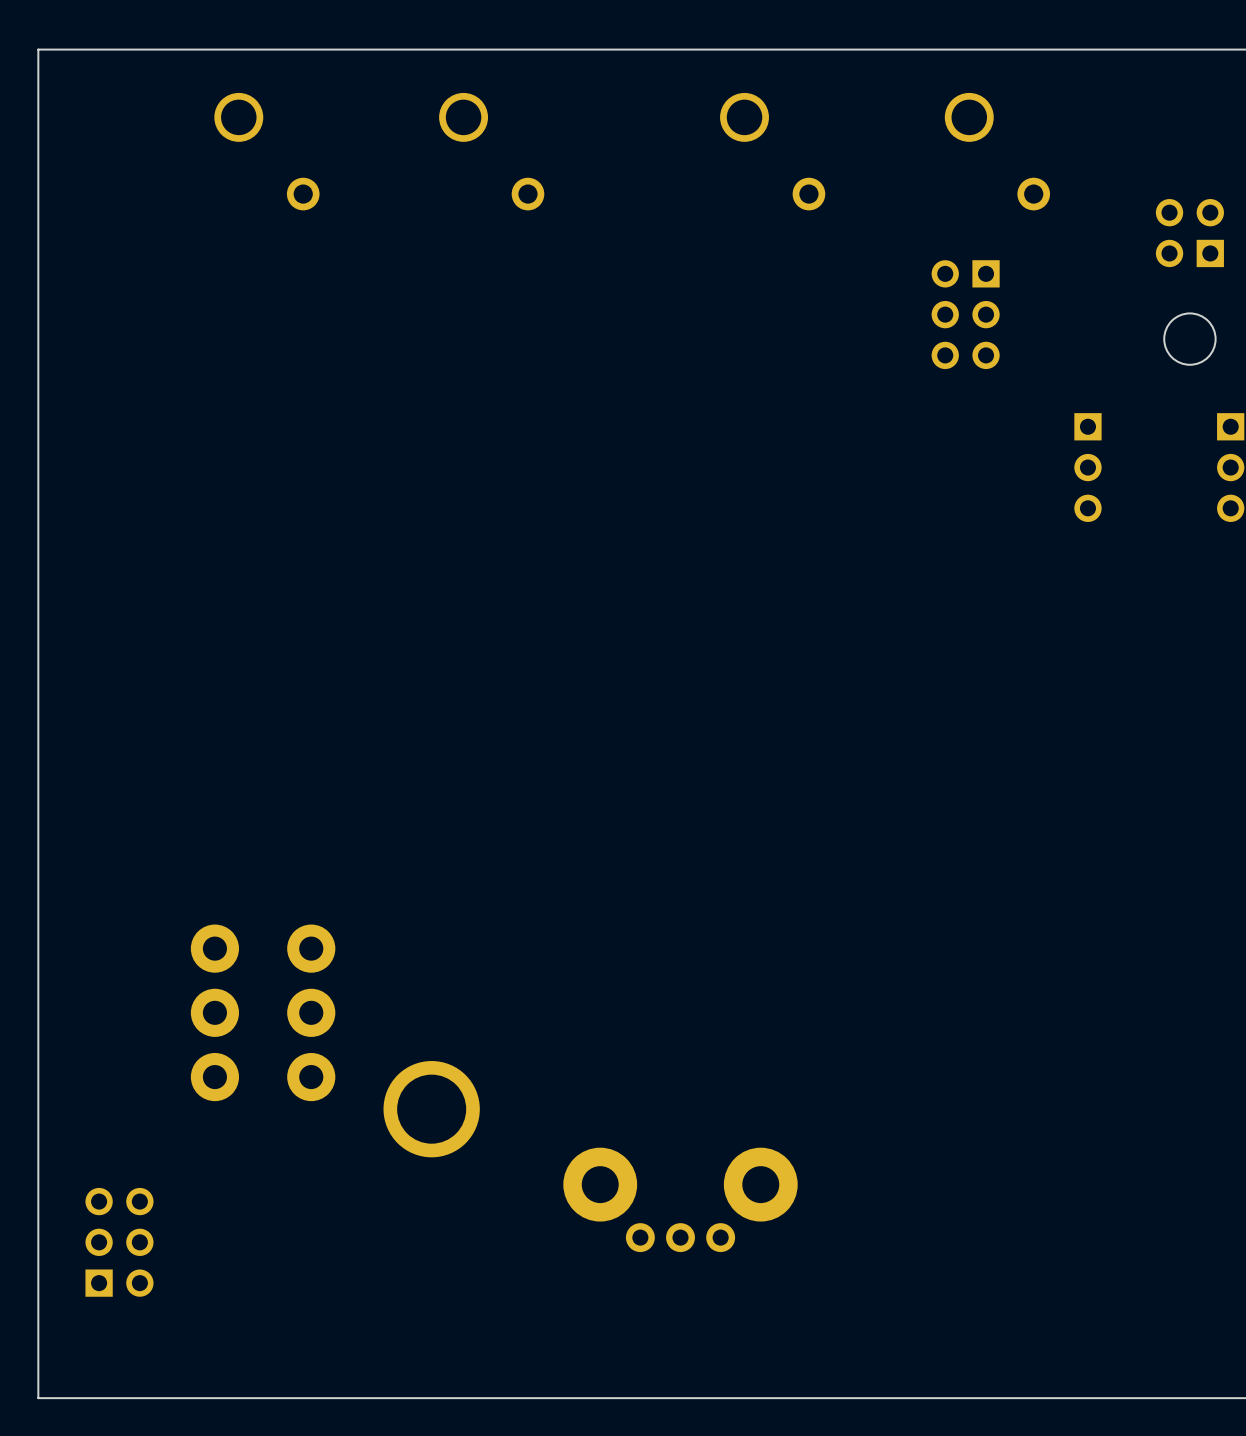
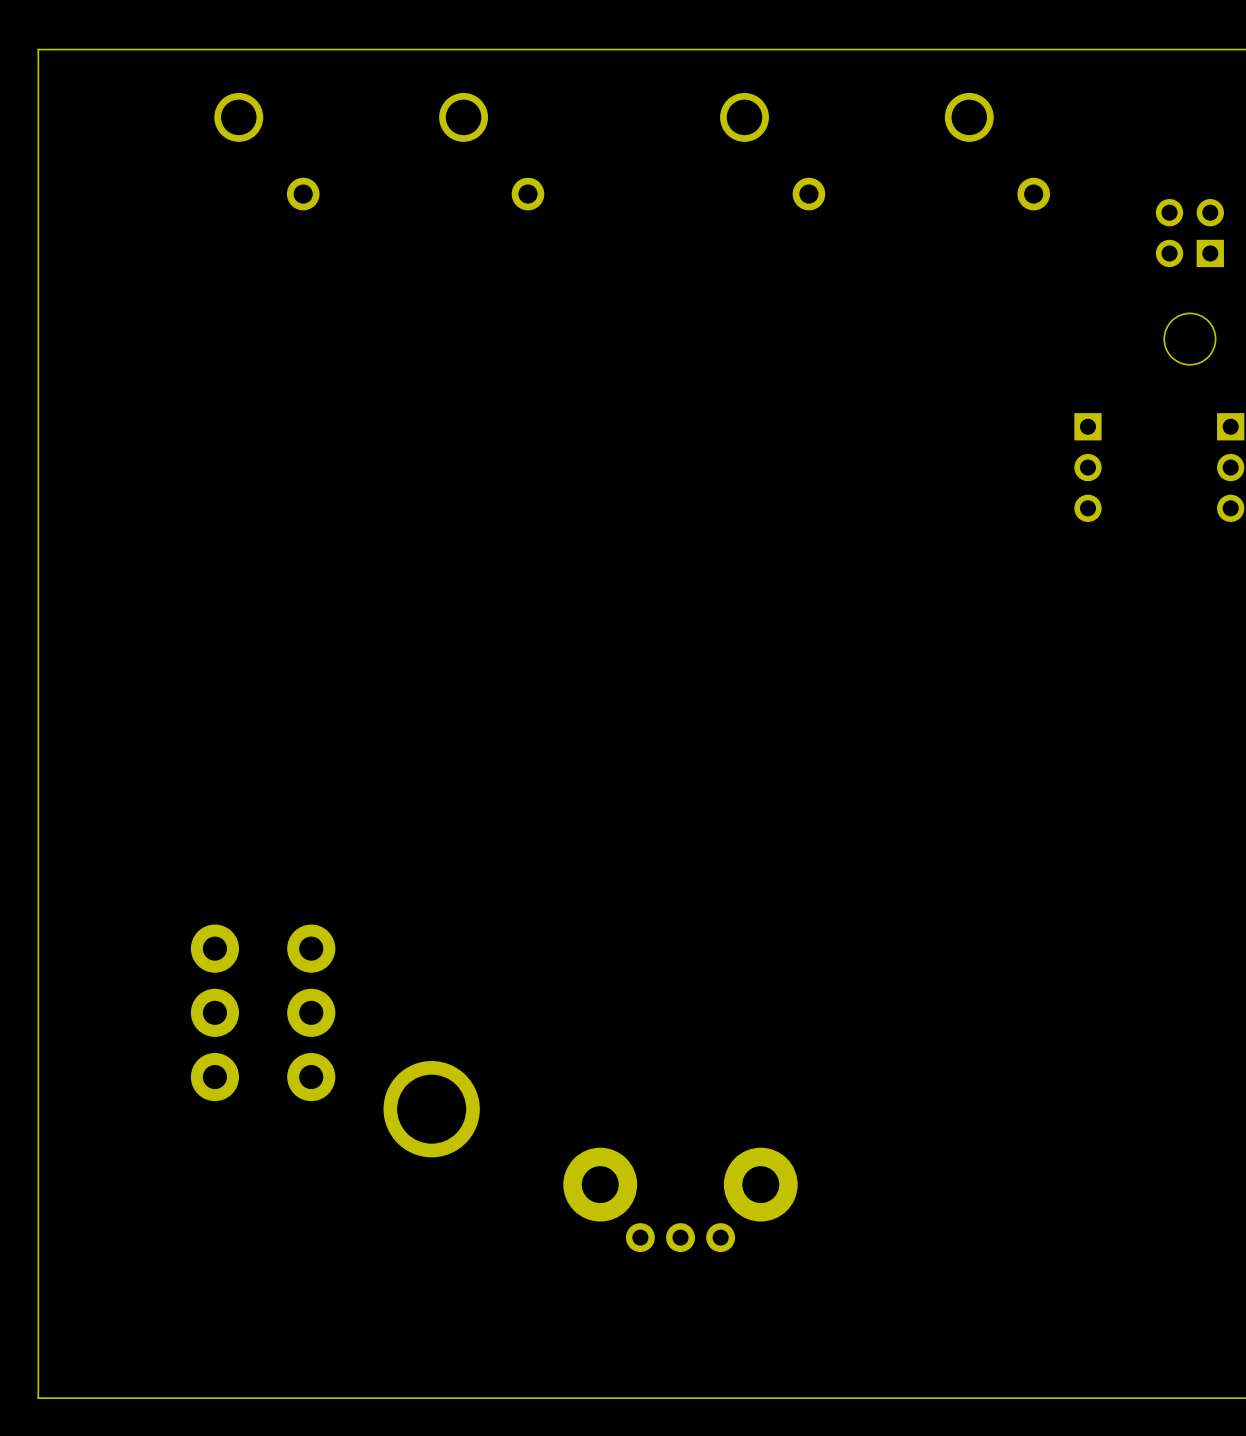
part: (965, 314) -> none
part: (119, 1242) -> none

